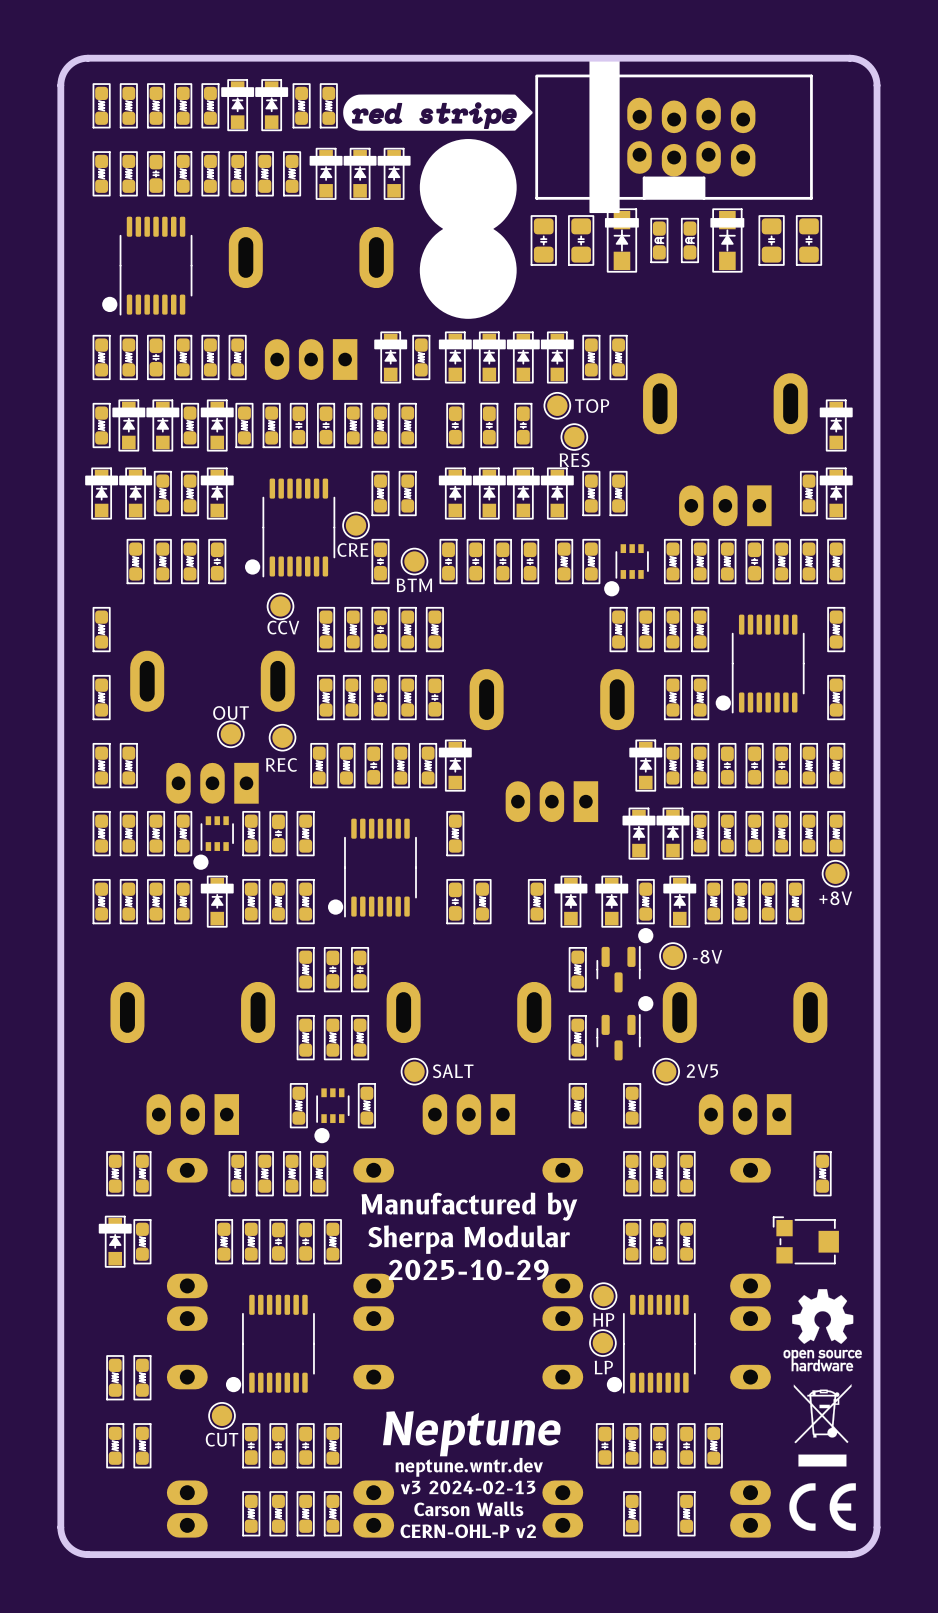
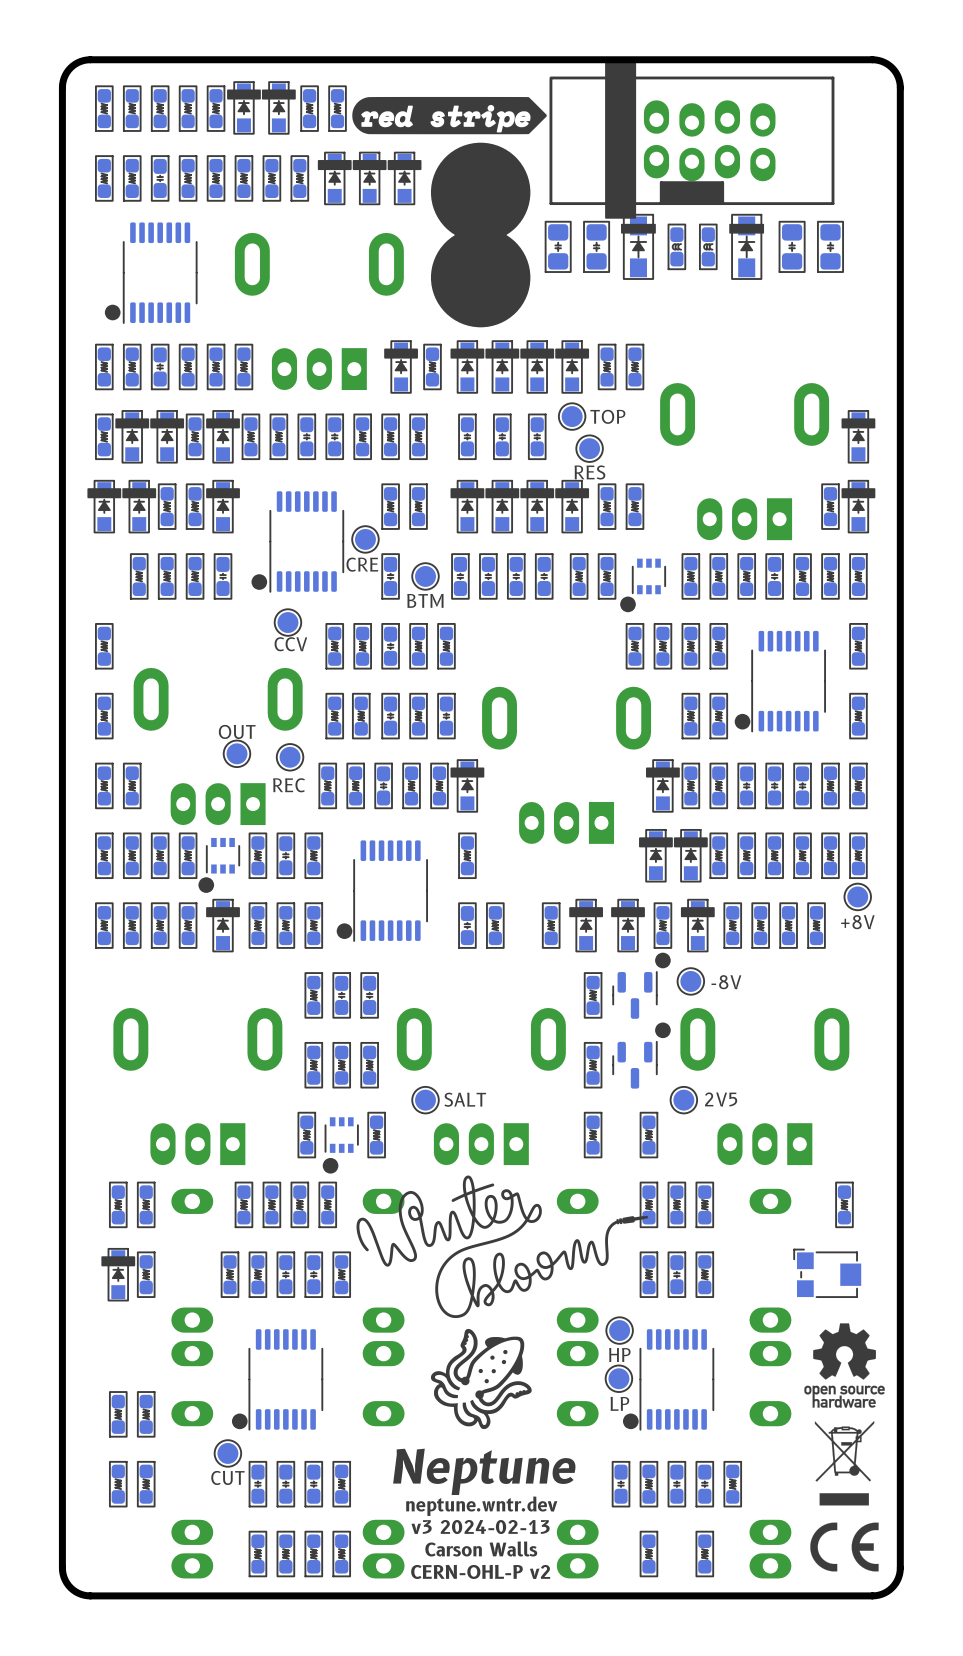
drawing: none -> [356, 1175, 649, 1430]
text: Manufactured by (469, 1206) -> none
text: Sherpa Modular (469, 1239) -> none
text: 2025-10-29 (468, 1269) -> none

